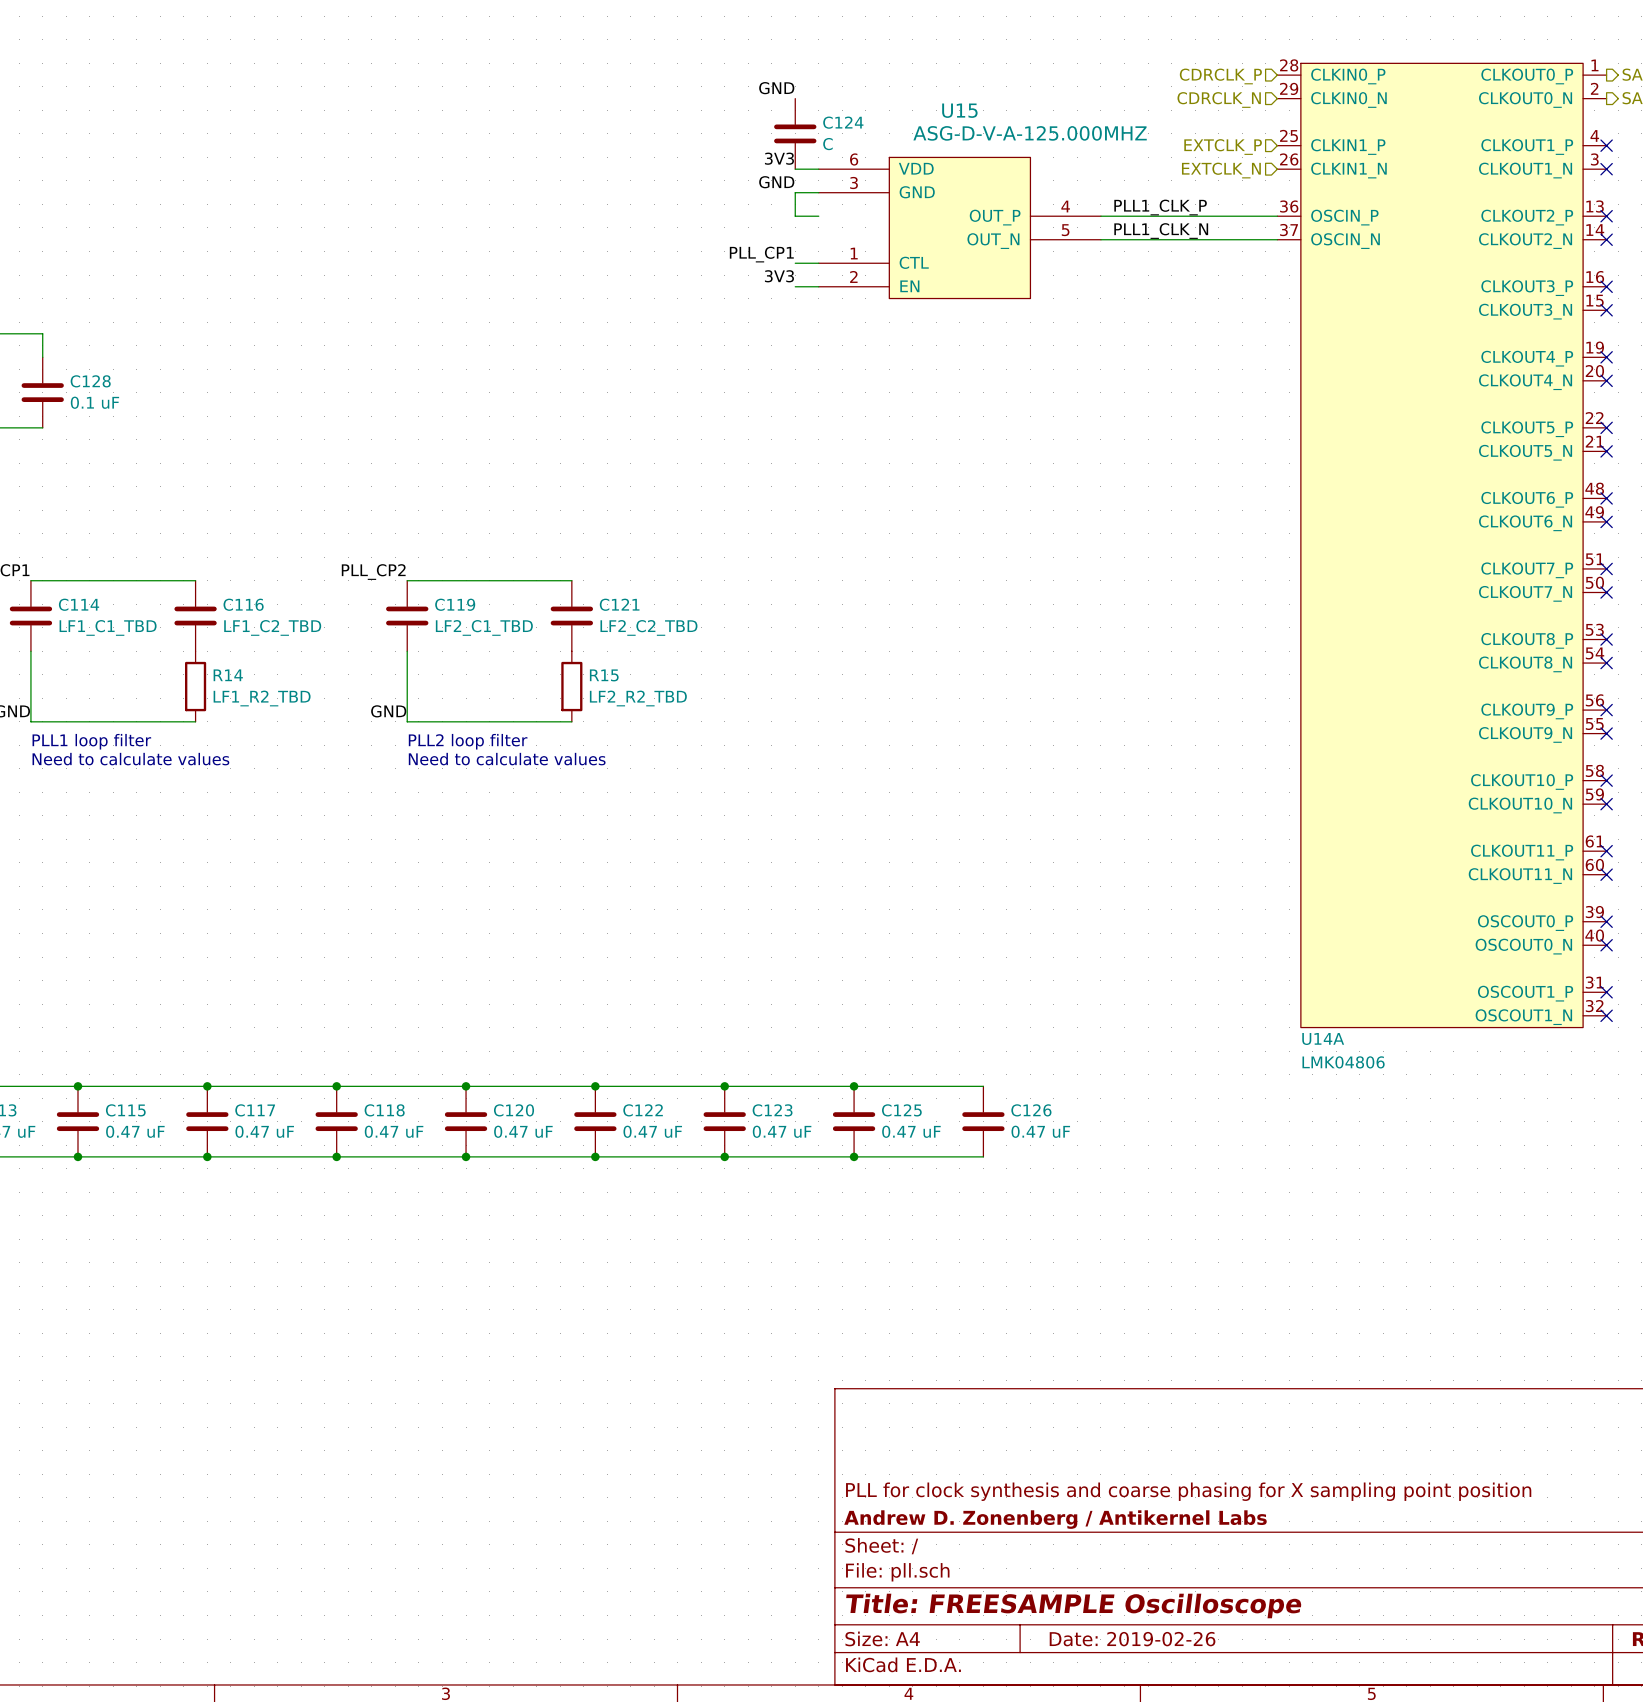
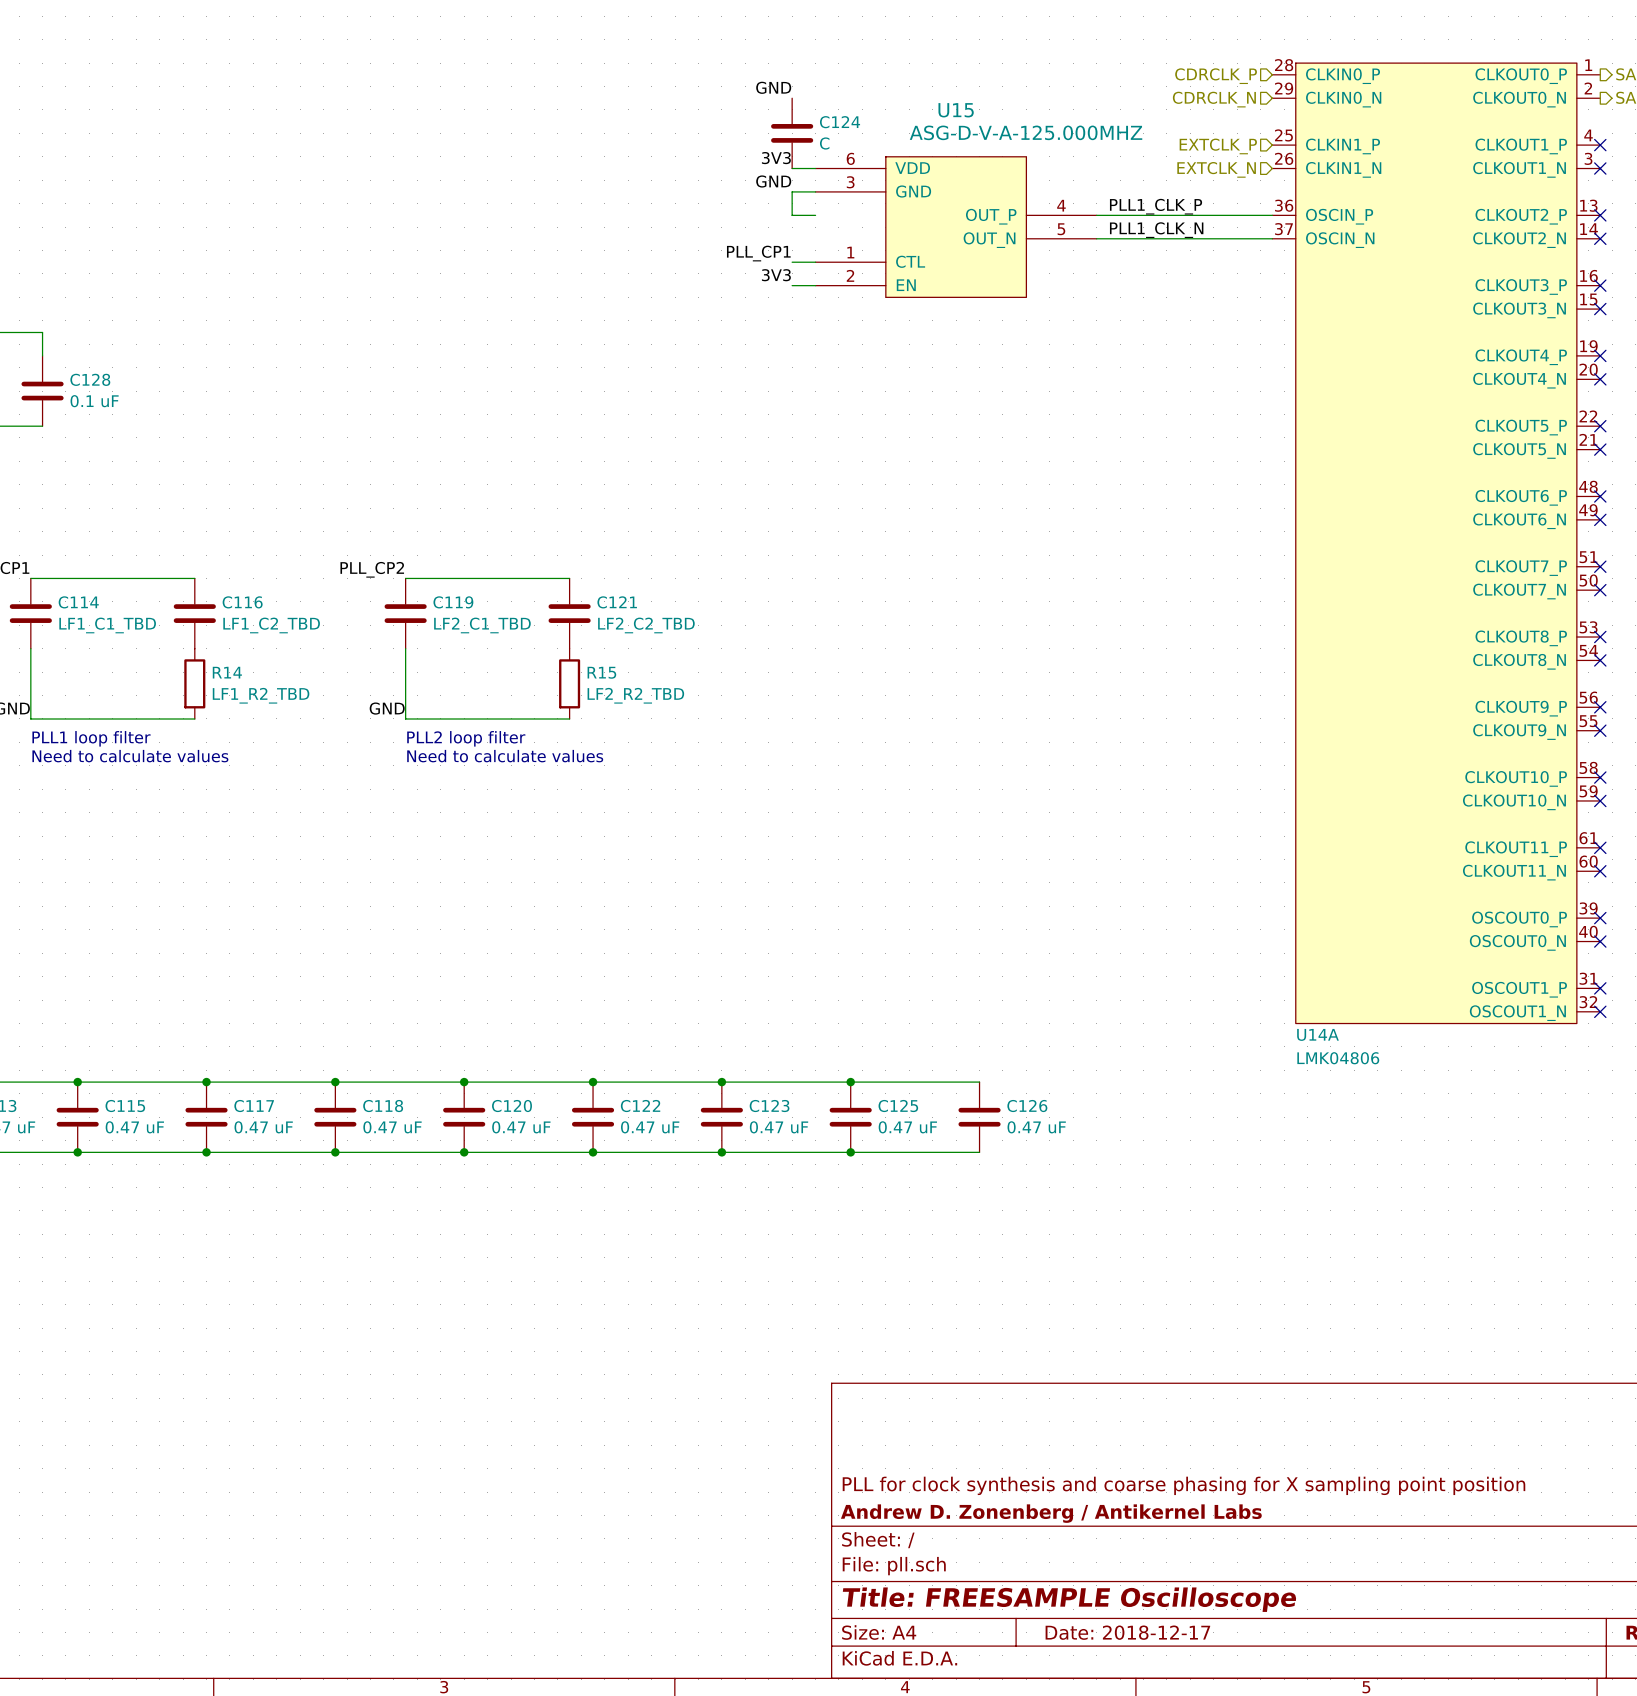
title block: Date: 2019-02-26 (1132, 1639) -> Date: 2018-12-17 (1127, 1632)

